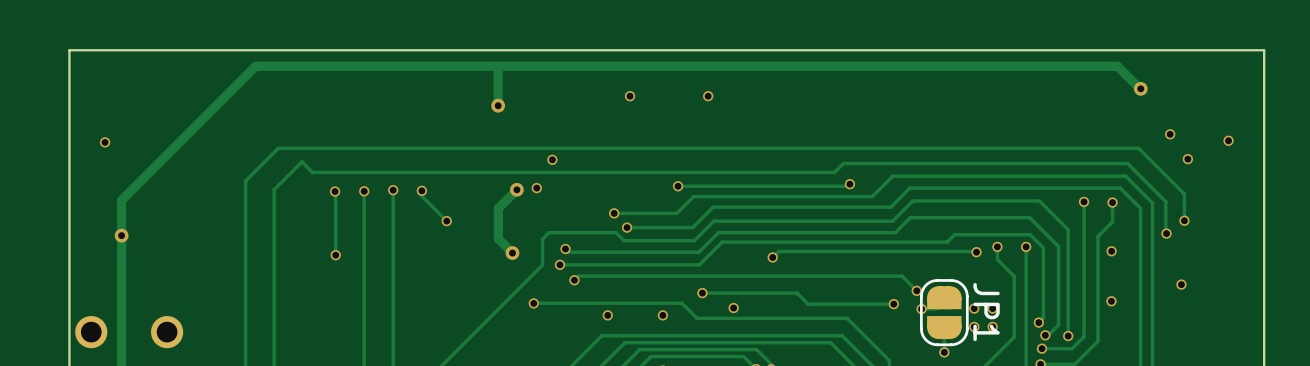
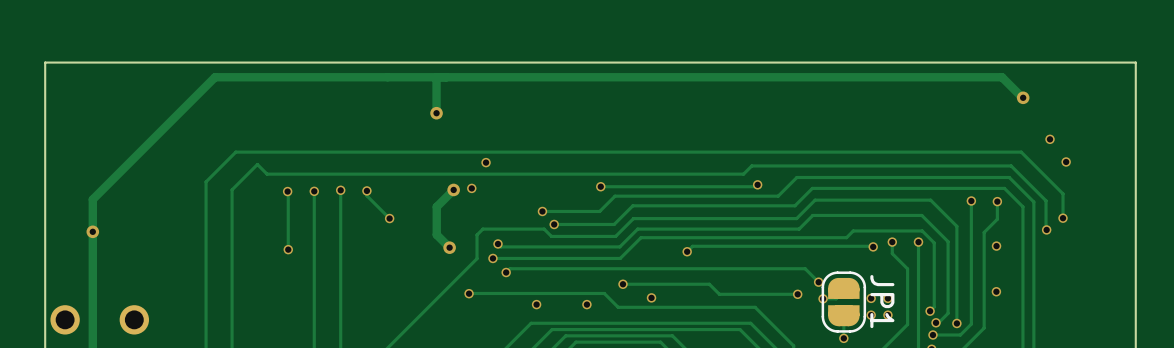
via: (630, 96) -> none
via: (708, 96) -> none
via: (1228, 140) -> none
via: (105, 142) -> none
via: (1181, 284) -> none

